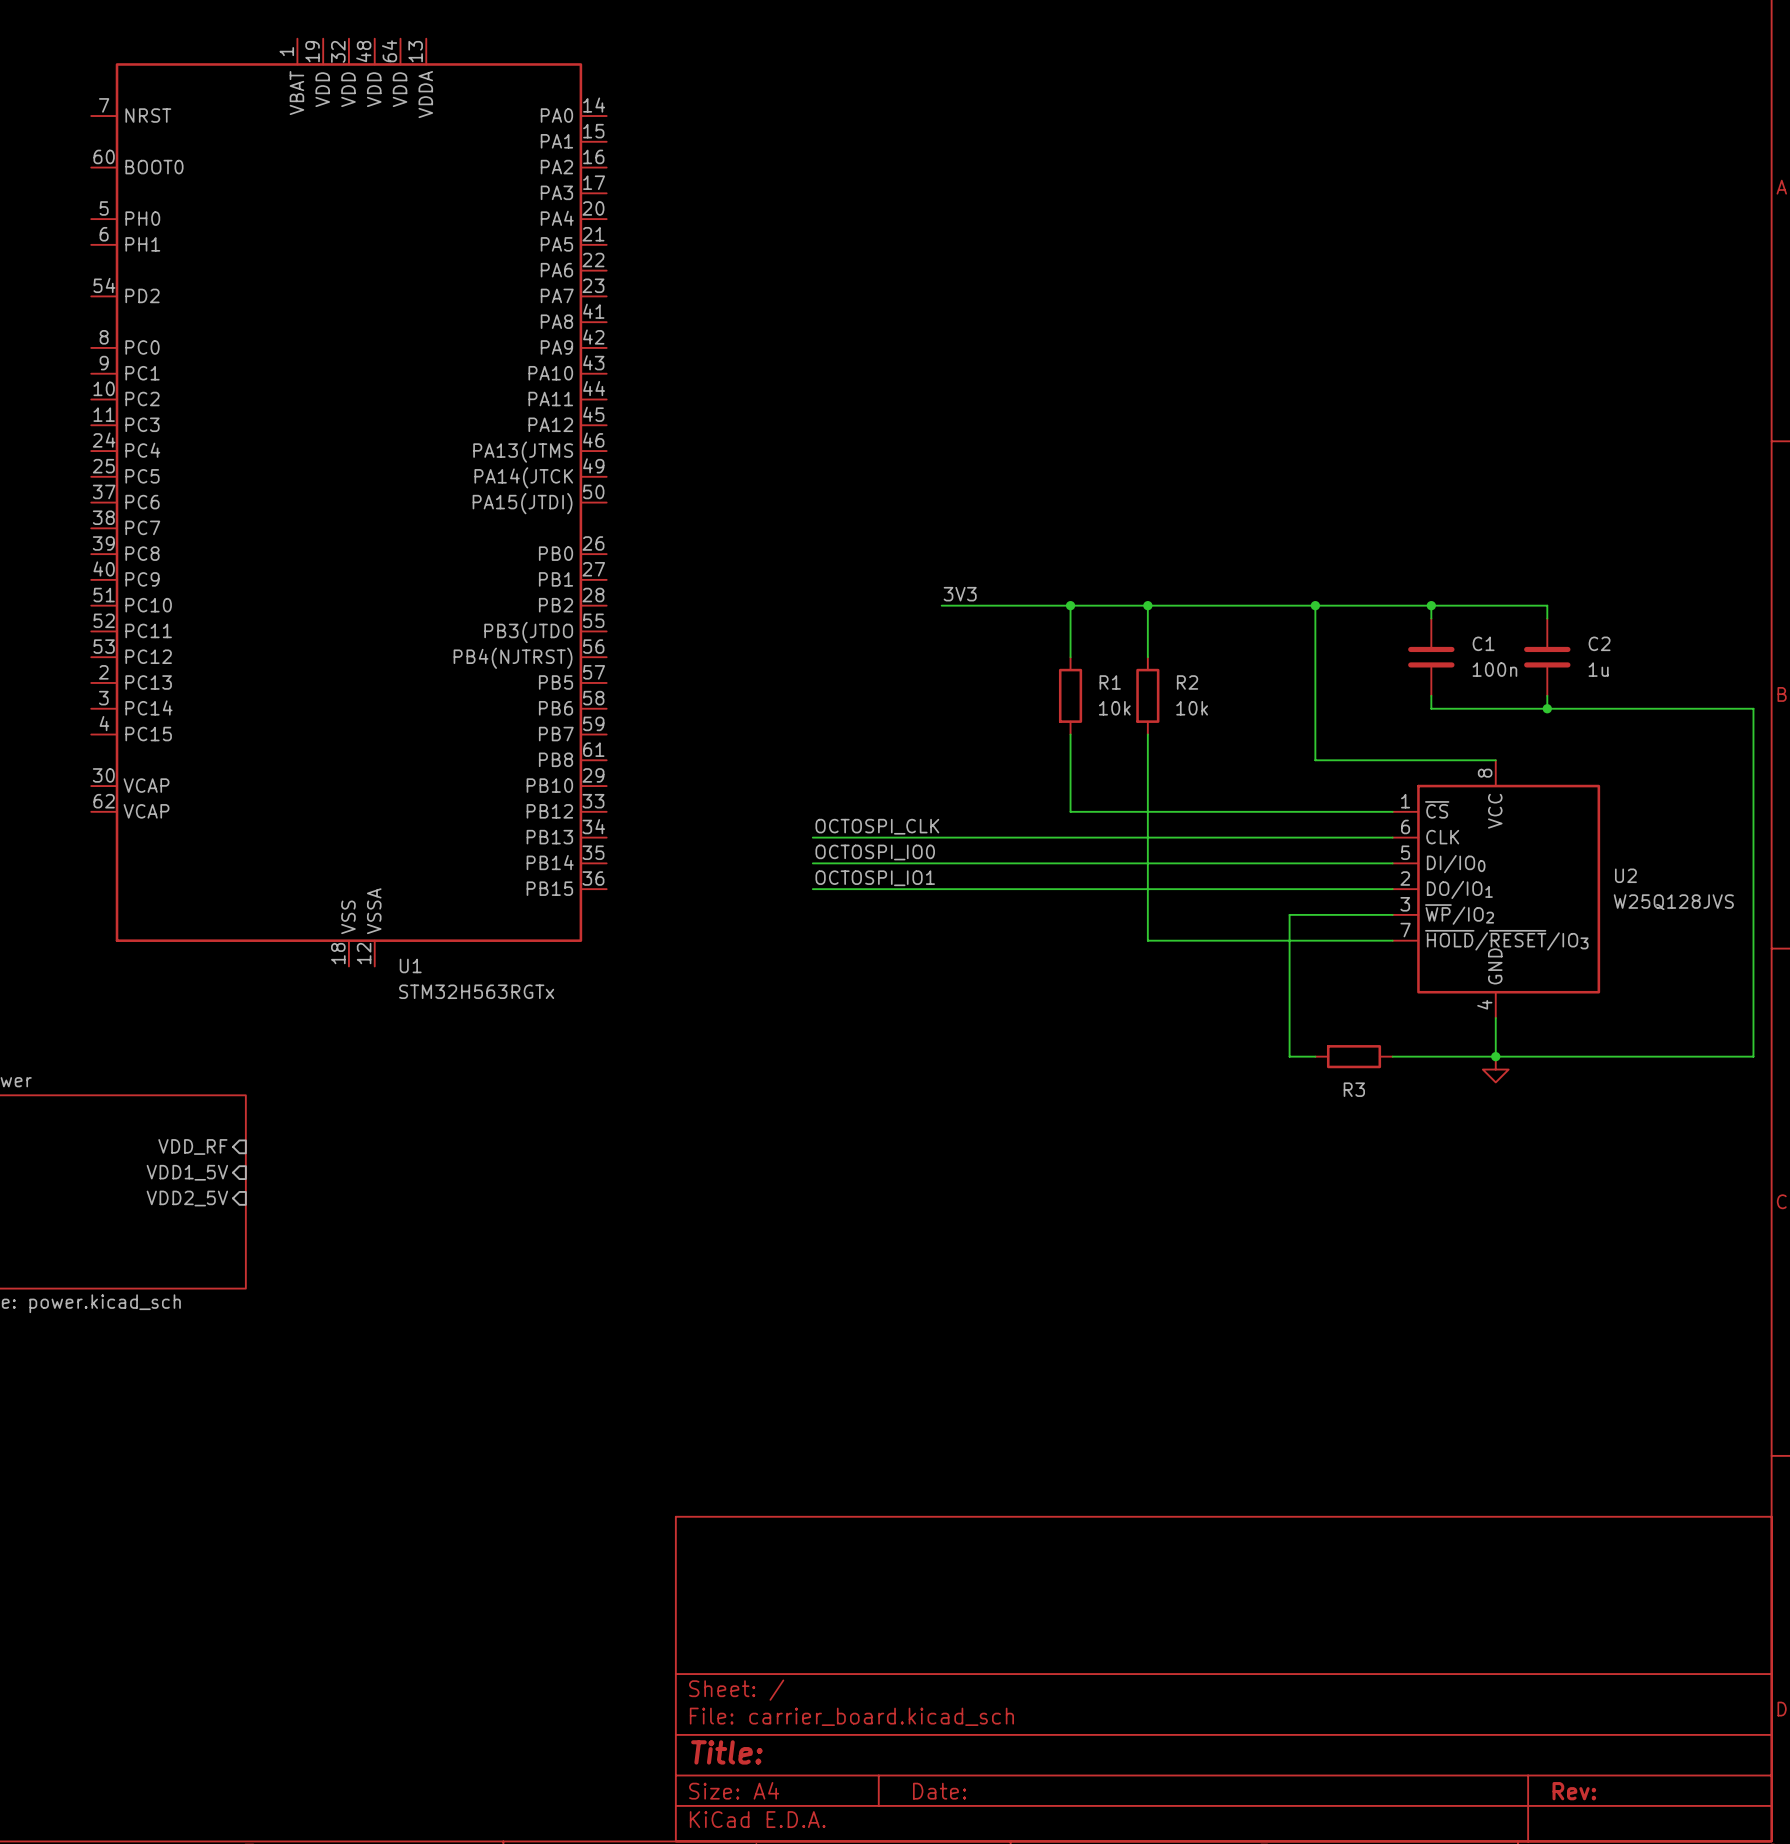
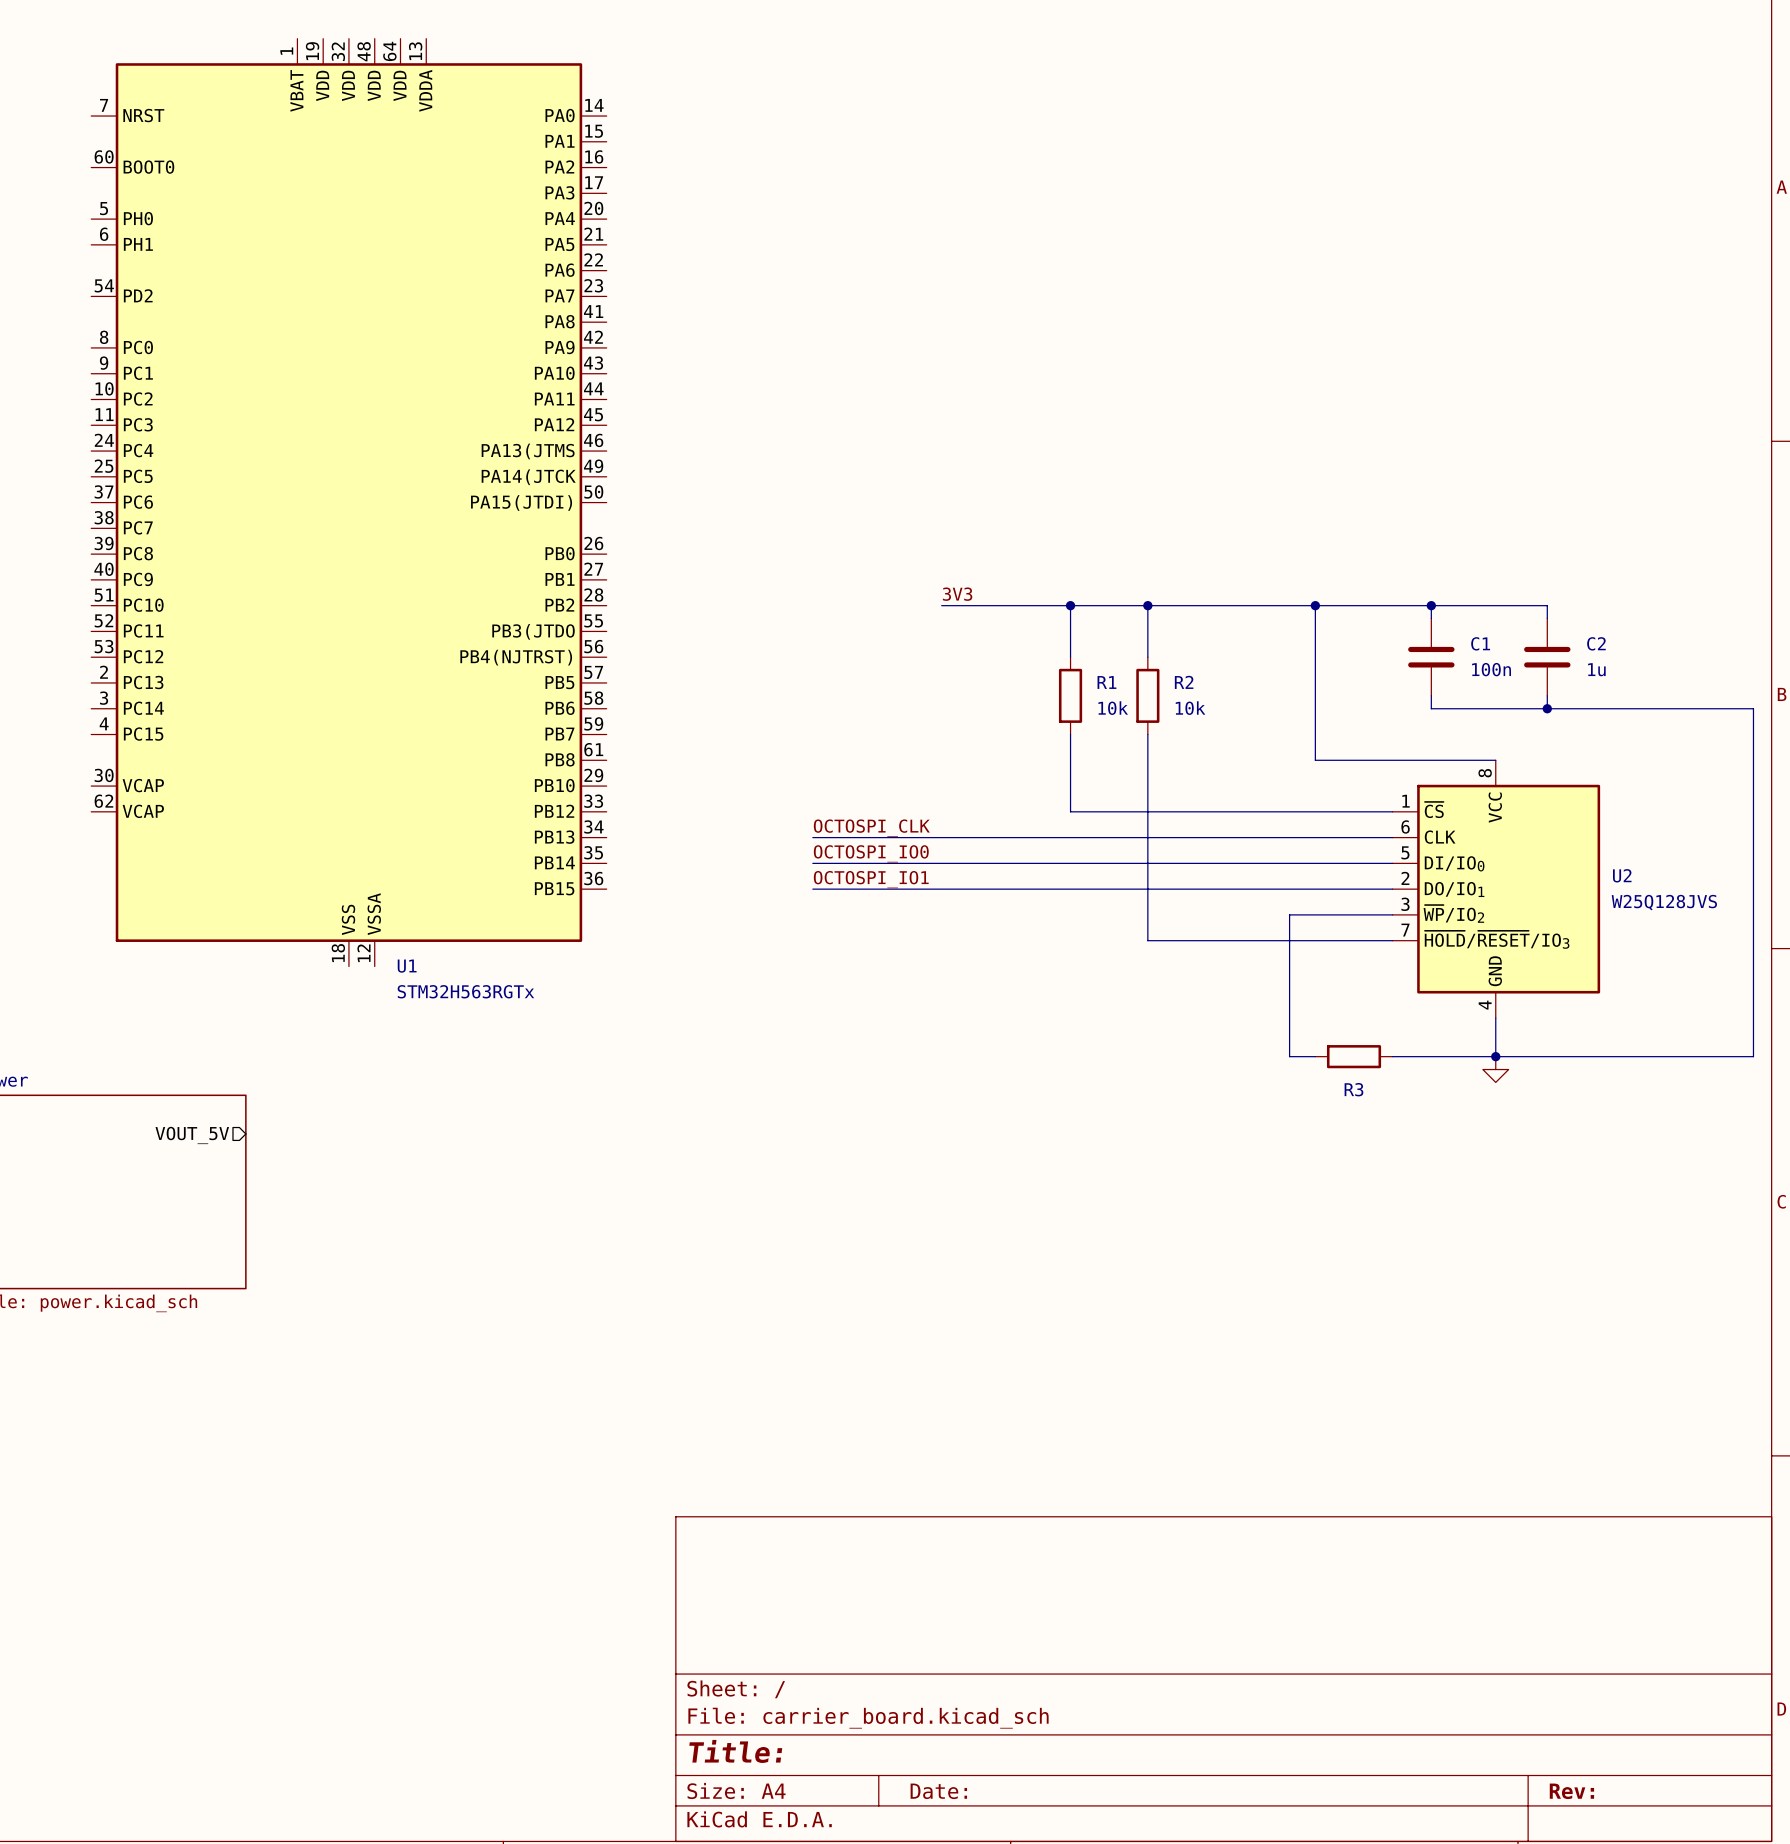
sheet pin: none -> VOUT_5V (192, 1135)
sheet pin: VDD_RF (192, 1146) -> none
sheet pin: VDD1_5V (187, 1172) -> none
sheet pin: VDD2_5V (187, 1198) -> none

